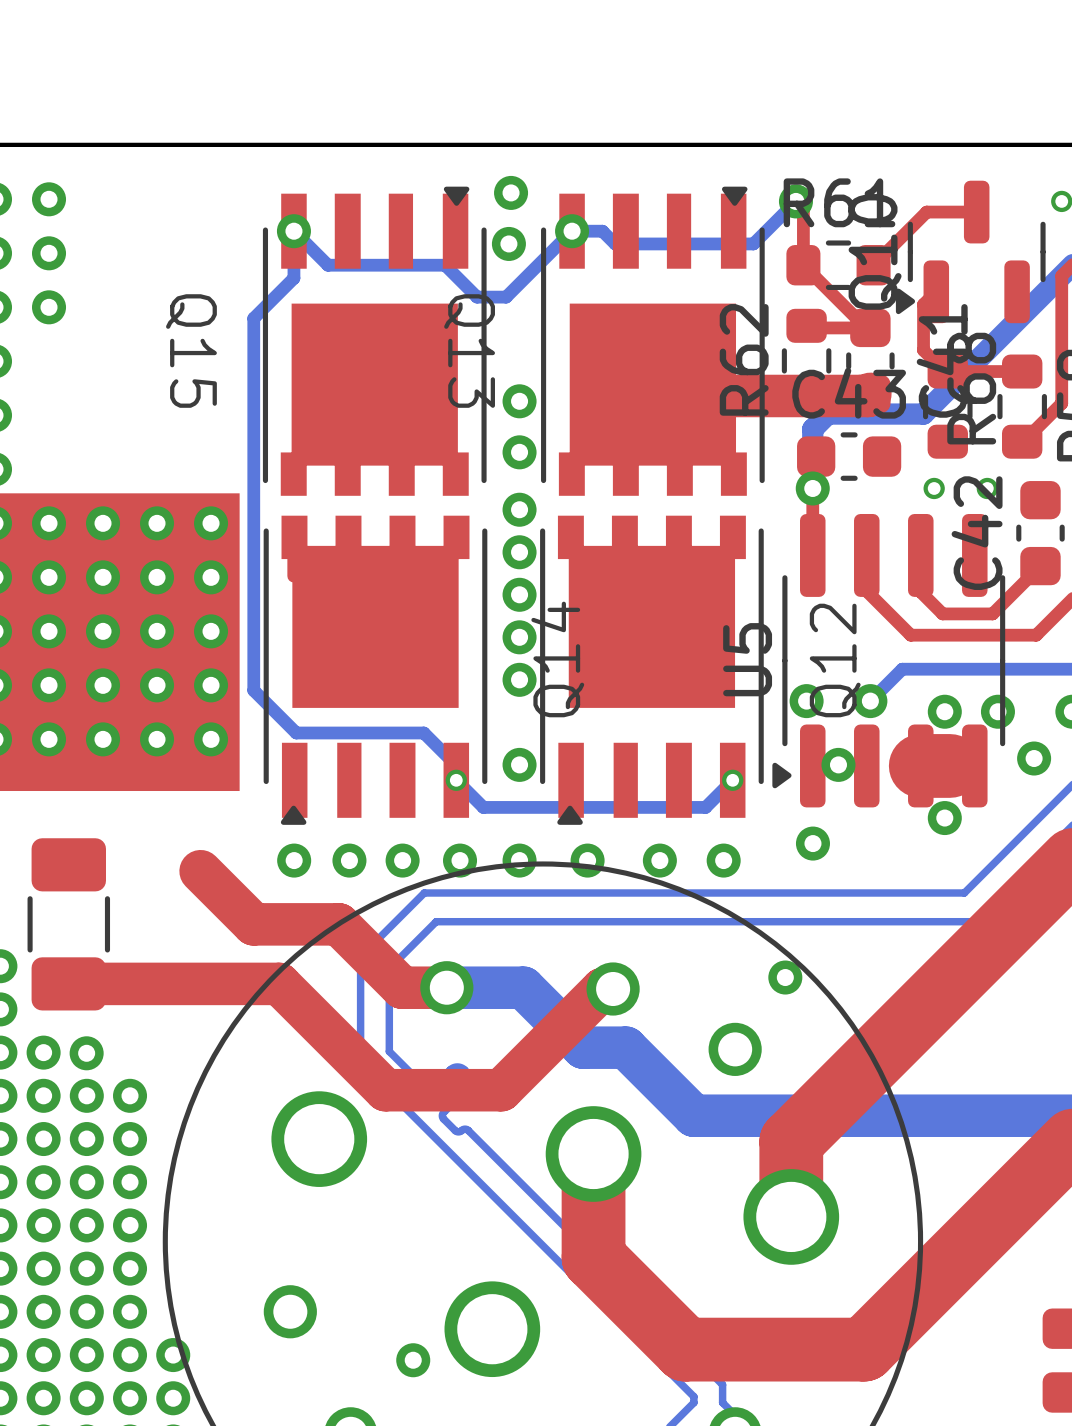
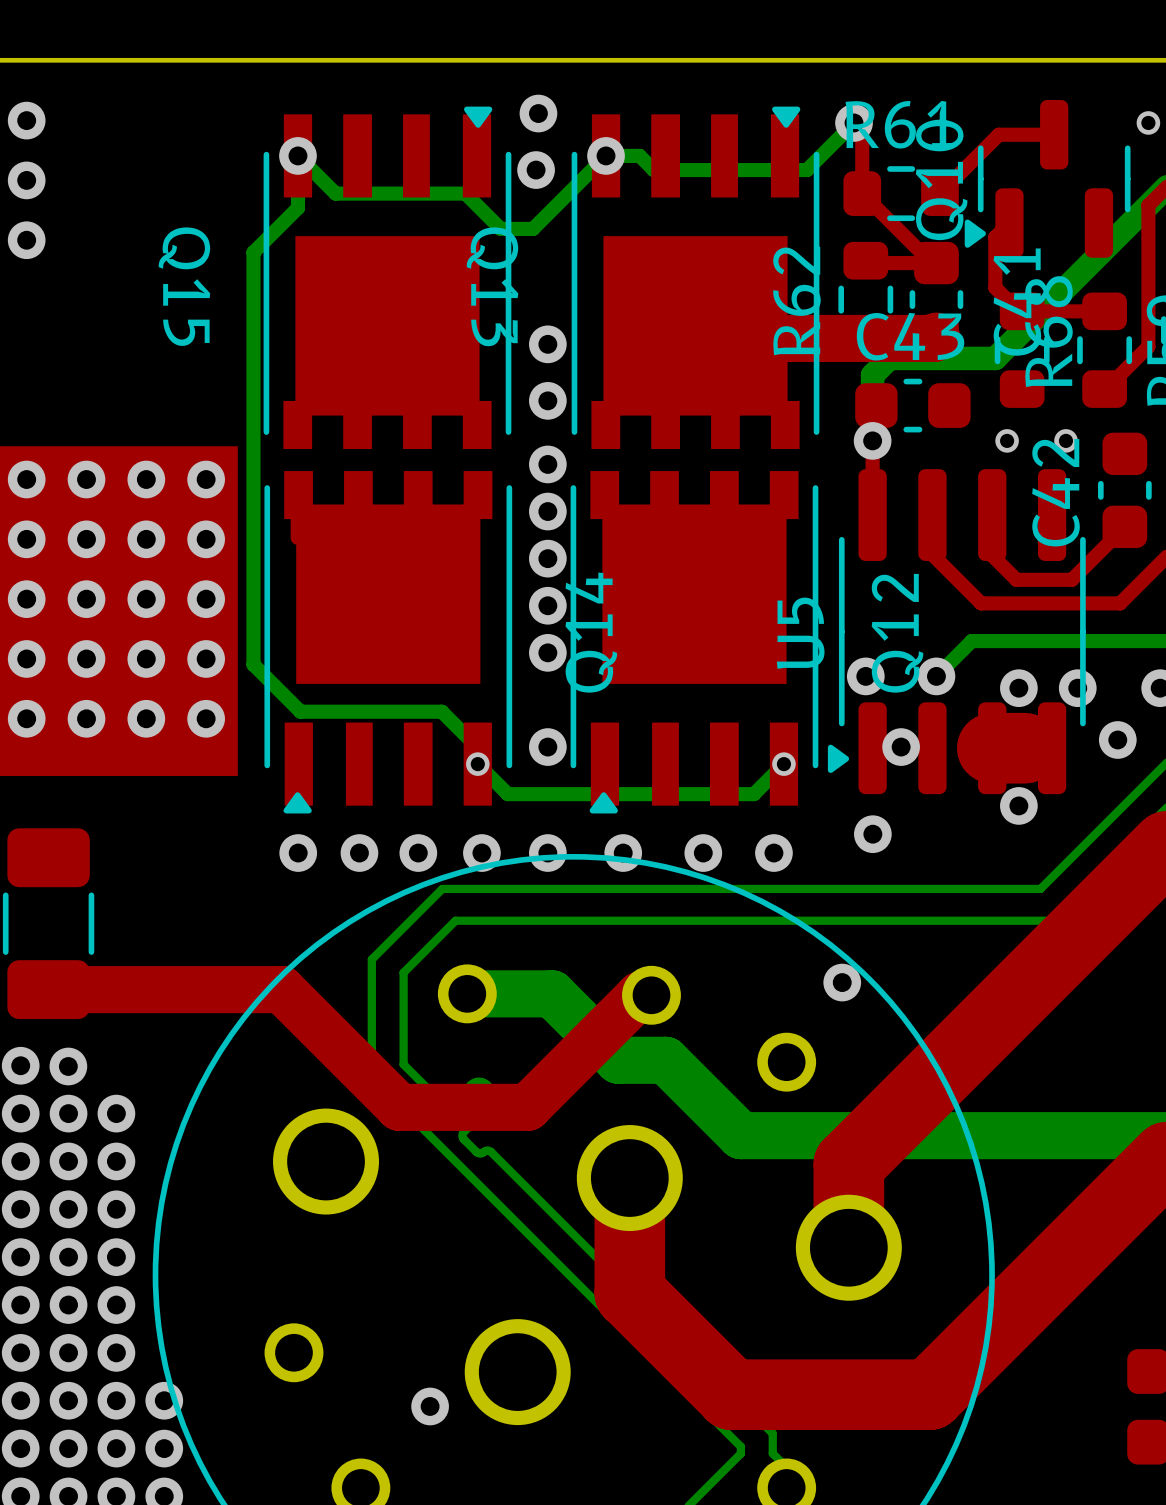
top track: (200, 871) (253, 924) (338, 924) (402, 987) (446, 987) -> none

